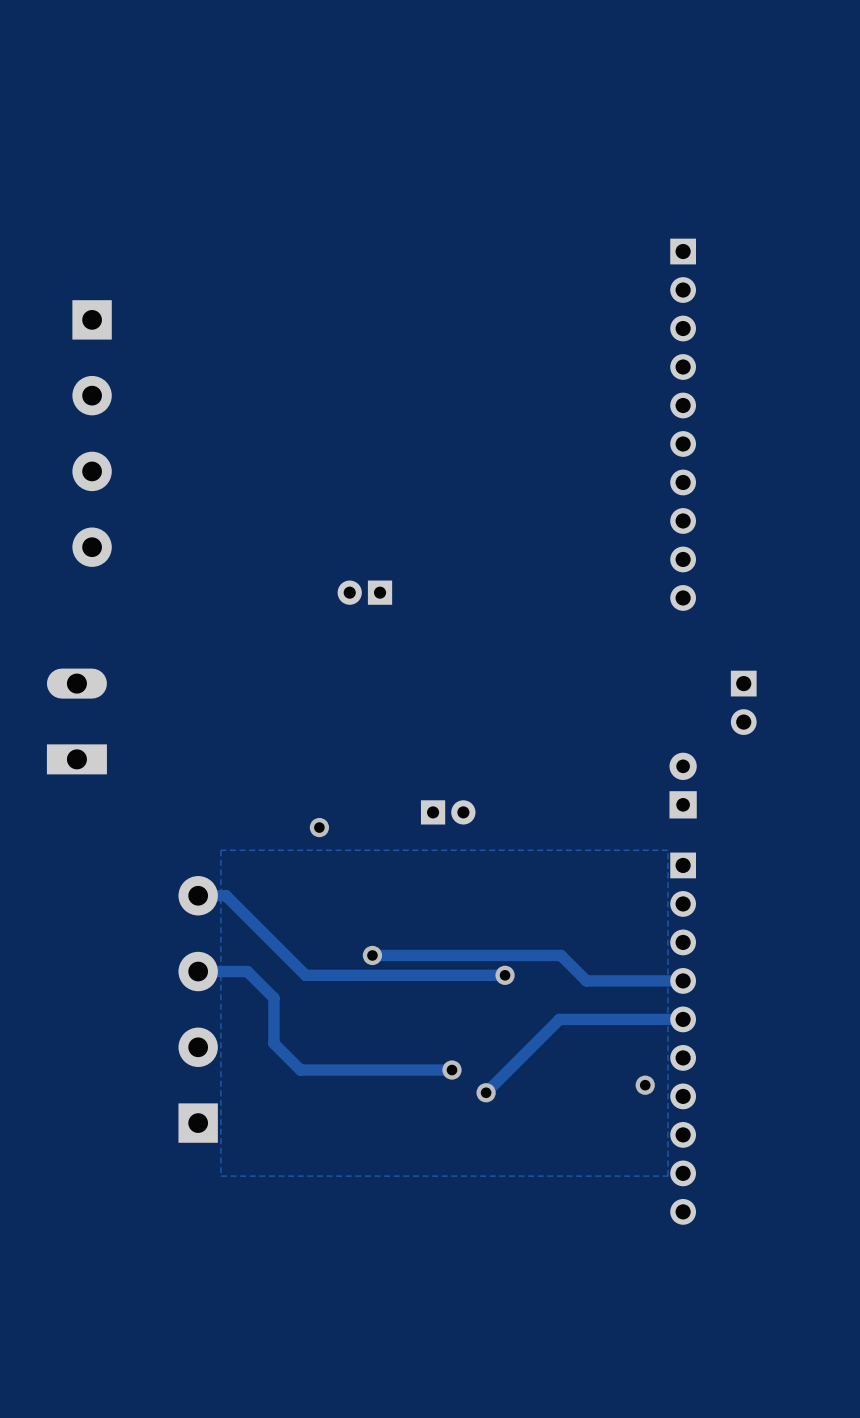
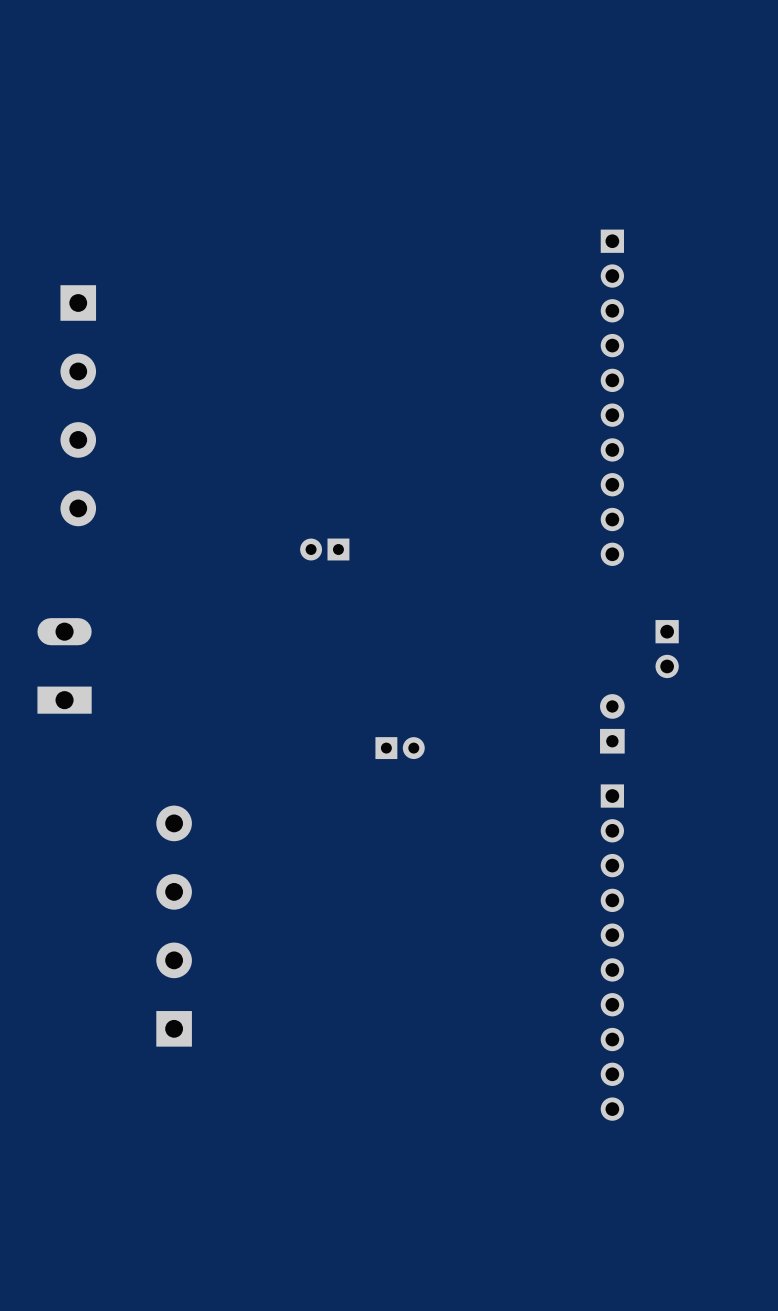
via: (319, 827) -> none
zone outline: (667, 850) (667, 1176) (220, 1176) (220, 850) (667, 850) -> none
track: (198, 895) (226, 895) (305, 975) (505, 975) -> none
track: (372, 955) (560, 955) (586, 980) (683, 980) -> none
via: (372, 955) -> none
track: (198, 971) (247, 971) (273, 998) (273, 1043) (300, 1070) (452, 1070) -> none
via: (505, 975) -> none
track: (683, 1019) (559, 1019) (486, 1092) -> none
via: (452, 1070) -> none
via: (645, 1085) -> none
via: (486, 1092) -> none

